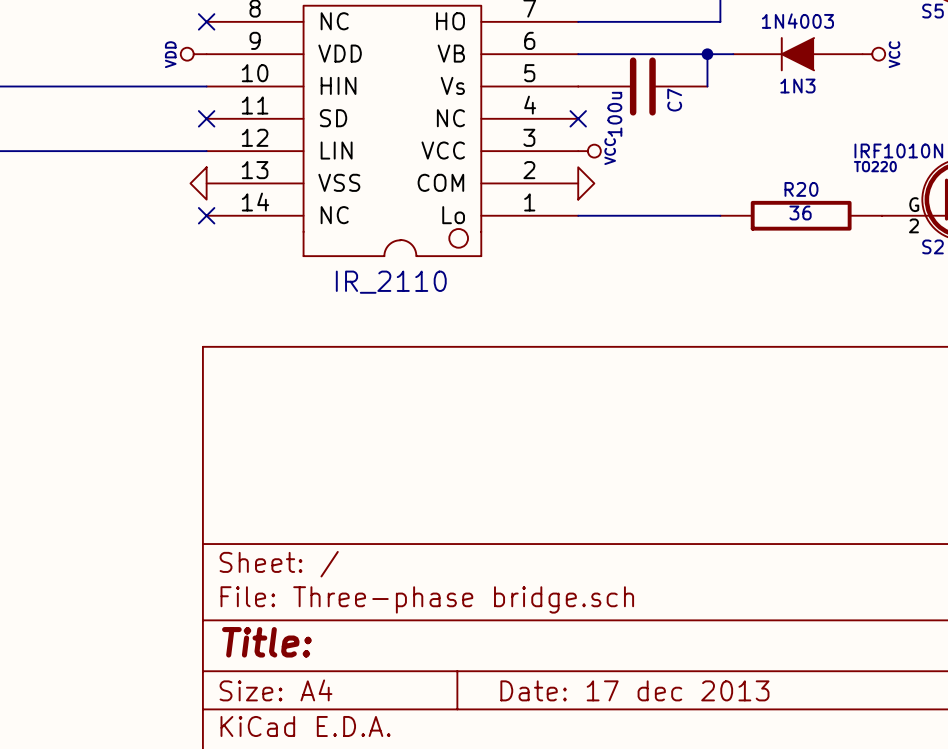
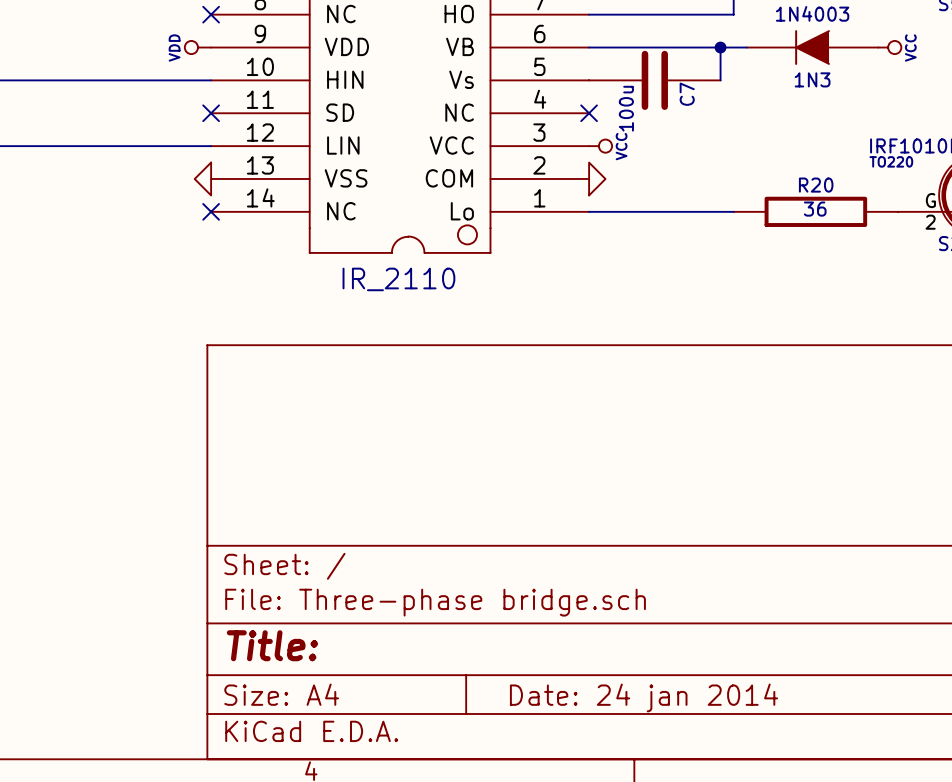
title block: Date: 17 dec 2013 (634, 690) -> Date: 24 jan 2014 (643, 697)

